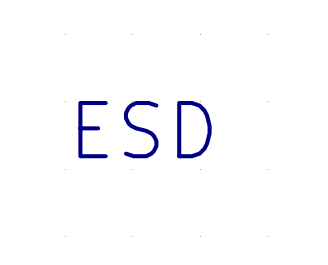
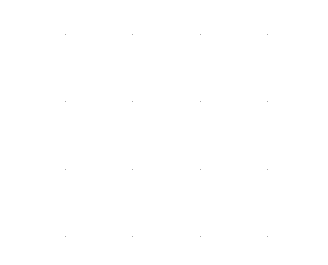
text: ESD (145, 129) -> none

